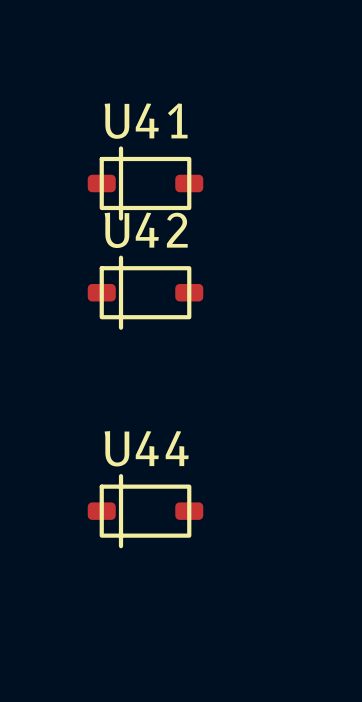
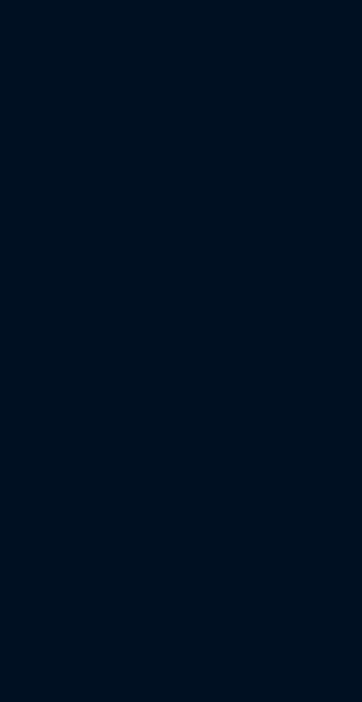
U41: (145, 183) -> none
U42: (145, 292) -> none
U44: (145, 511) -> none

